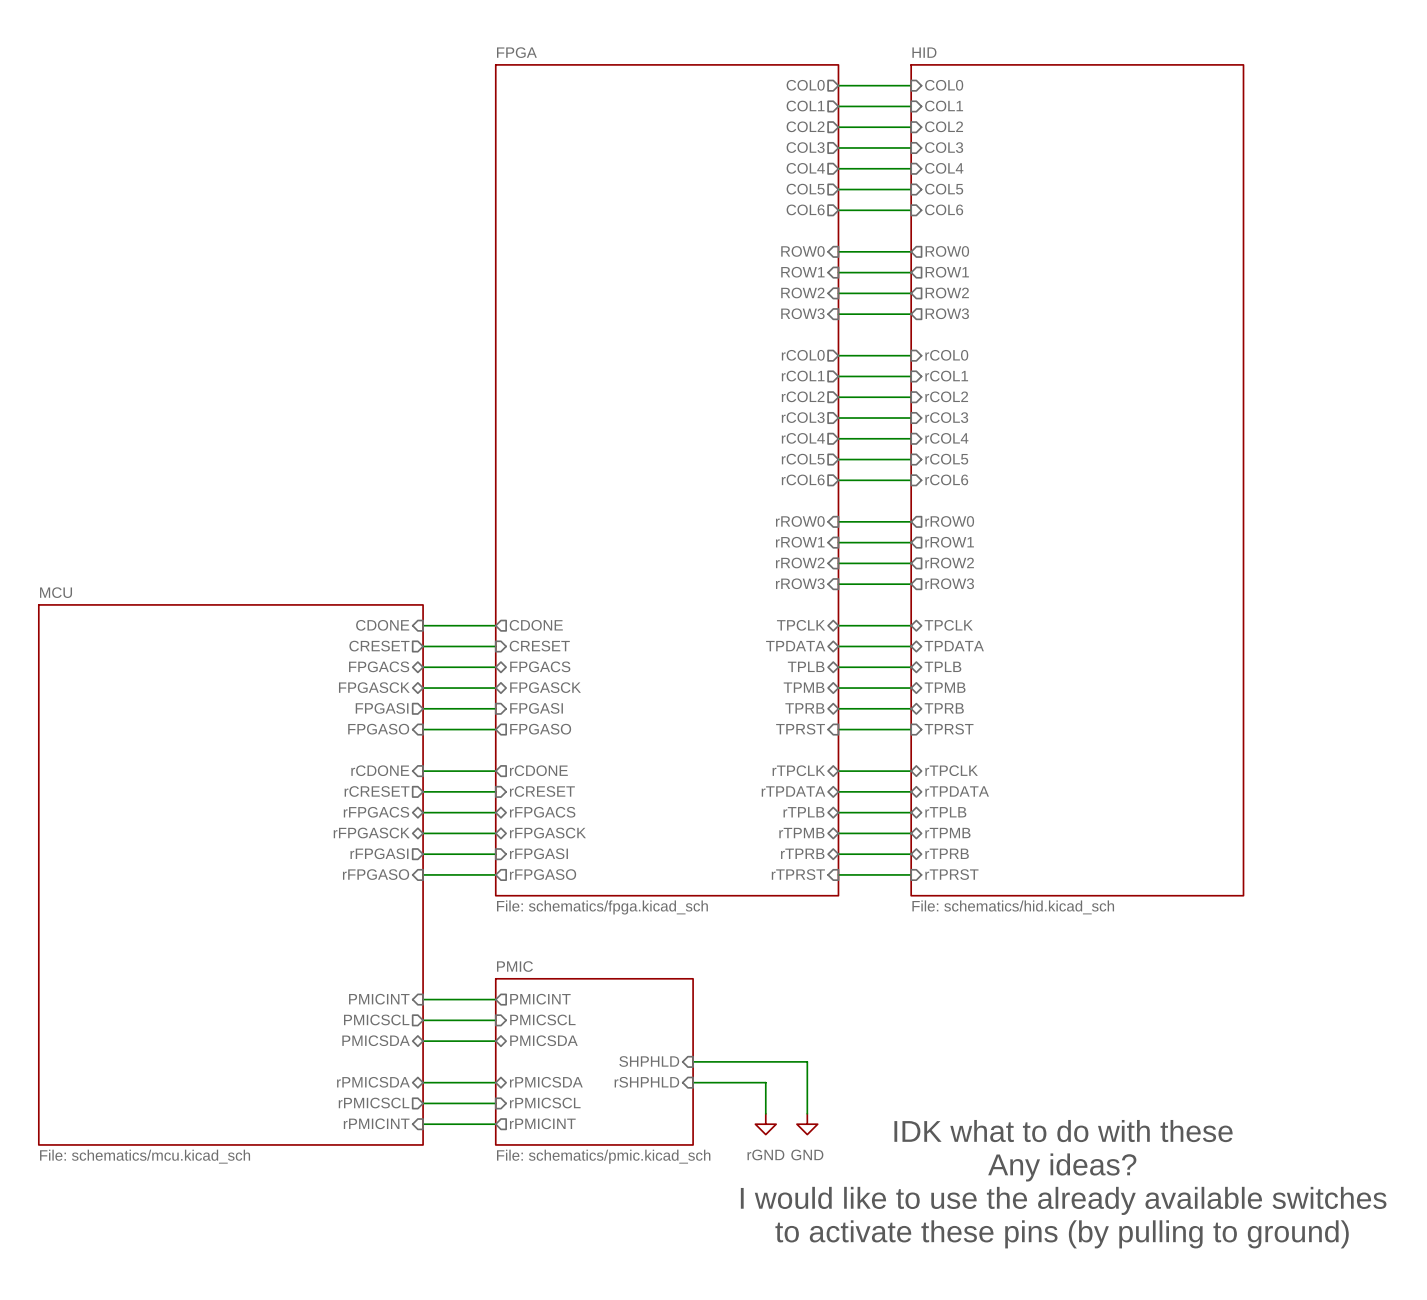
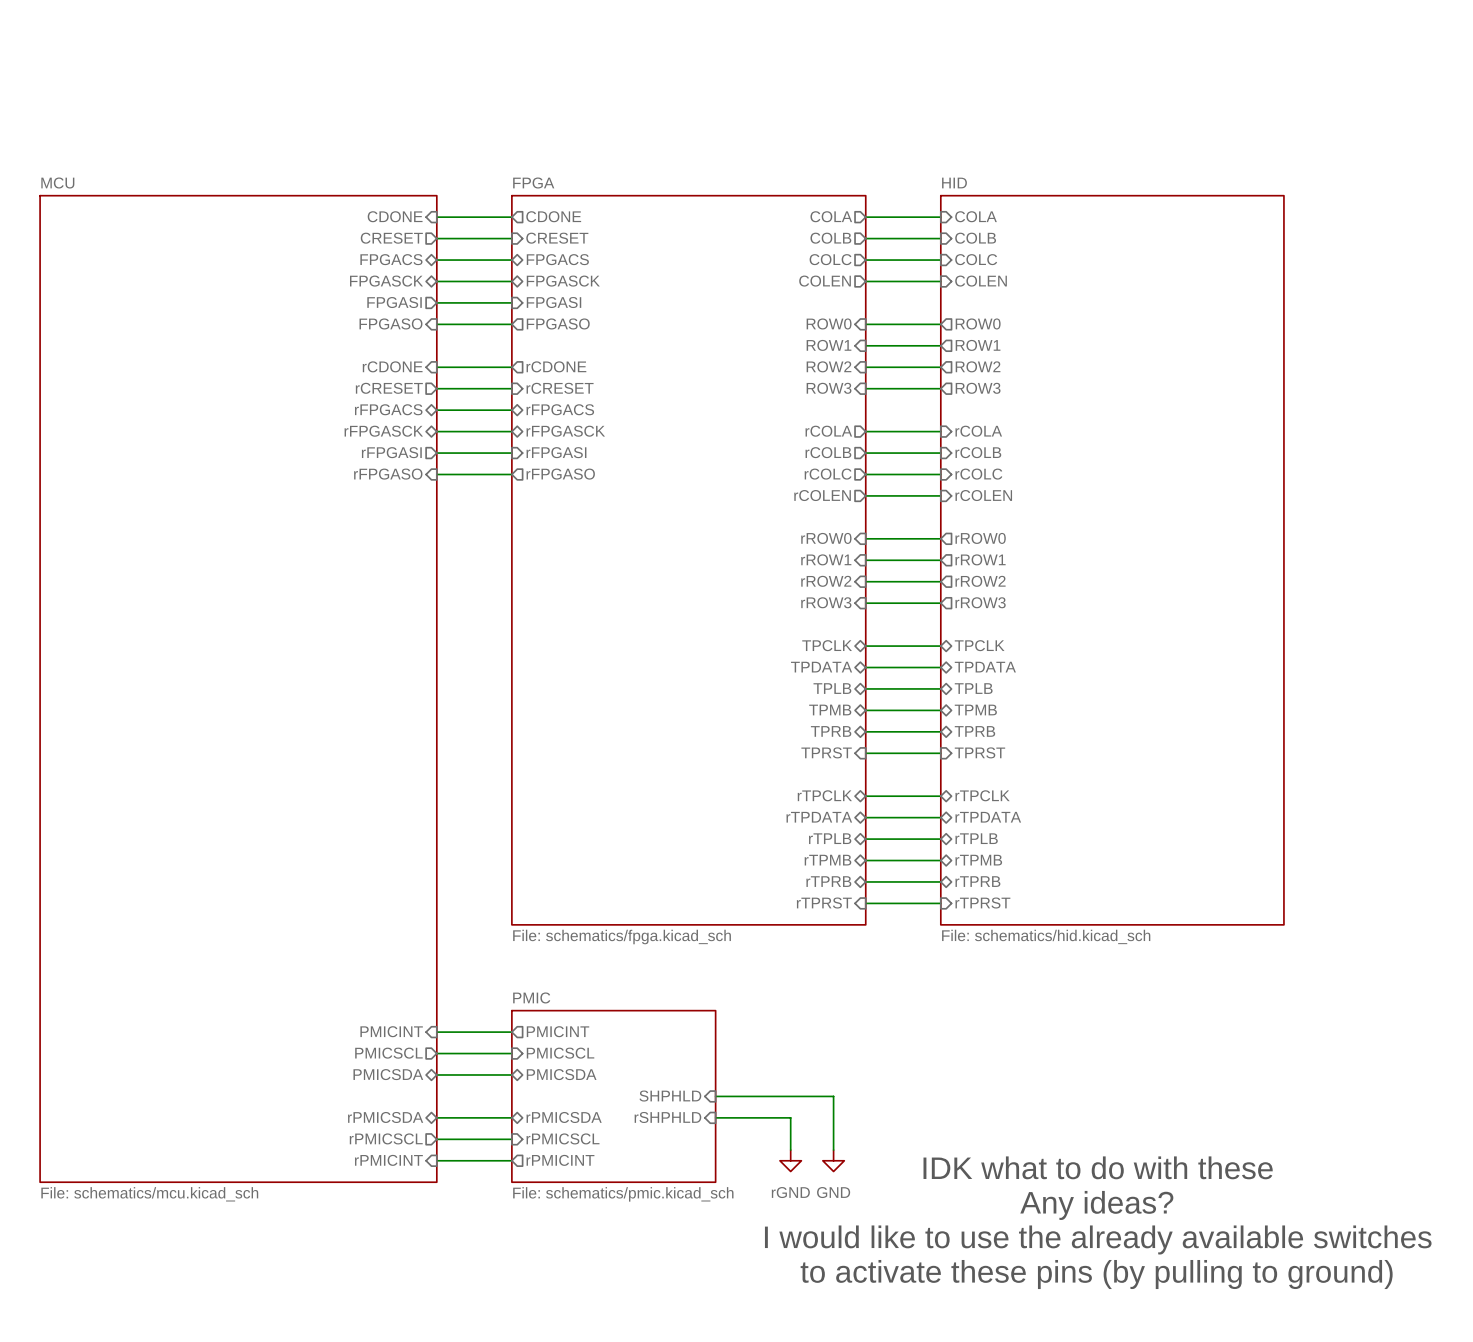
sheet pin: COL0 (805, 85) -> none
wire: (838, 85) (911, 85) -> none
sheet pin: COL0 (944, 85) -> none
sheet pin: COL1 (805, 106) -> none
wire: (838, 106) (911, 106) -> none
sheet pin: COL1 (944, 106) -> none
sheet pin: COL2 (805, 126) -> none
sheet pin: COL2 (944, 126) -> none
wire: (838, 127) (911, 127) -> none
sheet pin: COL3 (805, 147) -> none
wire: (838, 147) (911, 147) -> none
sheet pin: COL3 (944, 147) -> none
sheet pin: COL4 (805, 168) -> none
wire: (838, 168) (911, 168) -> none
sheet pin: COL4 (944, 168) -> none
sheet pin: COL5 (805, 189) -> none
wire: (838, 189) (911, 189) -> (865, 238) (940, 238)
sheet pin: COL5 (944, 189) -> none
sheet pin: none -> CDONE (395, 216)
sheet pin: none -> CDONE (553, 216)
sheet pin: COL6 (805, 209) -> COLA (831, 216)
sheet pin: COL6 (944, 209) -> COLA (976, 216)
wire: none -> (436, 217) (511, 217)
sheet pin: none -> CRESET (391, 238)
sheet pin: none -> CRESET (557, 238)
sheet pin: none -> COLB (830, 238)
sheet pin: none -> COLB (975, 238)
wire: none -> (436, 238) (511, 238)
sheet pin: none -> FPGACS (391, 259)
wire: none -> (436, 260) (511, 260)
sheet pin: none -> FPGACS (557, 259)
sheet pin shape: input (802, 251) -> output (830, 259)
sheet pin: ROW0 (802, 251) -> COLC (830, 259)
sheet pin shape: output (947, 251) -> input (976, 259)
sheet pin: ROW0 (947, 251) -> COLC (976, 259)
sheet pin: none -> FPGASCK (386, 281)
wire: none -> (436, 281) (511, 281)
sheet pin: none -> FPGASCK (563, 281)
sheet pin shape: input (802, 272) -> output (825, 281)
sheet pin: ROW1 (802, 272) -> COLEN (825, 281)
sheet pin shape: output (947, 272) -> input (981, 281)
sheet pin: ROW1 (947, 272) -> COLEN (981, 281)
sheet pin: none -> FPGASI (394, 302)
sheet pin: none -> FPGASI (554, 302)
sheet pin: ROW2 (802, 292) -> none
sheet pin: ROW2 (947, 292) -> none
wire: none -> (436, 302) (511, 302)
wire: (838, 293) (911, 293) -> (865, 345) (940, 345)
sheet pin: none -> FPGASO (390, 323)
sheet pin: none -> FPGASO (558, 323)
sheet pin: ROW3 (802, 313) -> ROW0 (829, 323)
sheet pin: ROW3 (947, 313) -> ROW0 (978, 323)
wire: none -> (436, 324) (511, 324)
sheet pin: none -> ROW1 (829, 345)
sheet pin: none -> ROW1 (978, 345)
sheet pin: none -> rCDONE (392, 366)
wire: none -> (436, 367) (511, 367)
sheet pin: none -> rCDONE (556, 366)
sheet pin shape: output (803, 355) -> input (829, 366)
sheet pin: rCOL0 (803, 355) -> ROW2 (829, 366)
sheet pin shape: input (946, 355) -> output (978, 366)
sheet pin: rCOL0 (946, 355) -> ROW2 (978, 366)
sheet pin: none -> rCRESET (389, 388)
wire: none -> (436, 388) (511, 388)
sheet pin: none -> rCRESET (560, 388)
sheet pin shape: output (803, 376) -> input (829, 388)
sheet pin: rCOL1 (803, 376) -> ROW3 (829, 388)
sheet pin shape: input (946, 376) -> output (978, 388)
sheet pin: rCOL1 (946, 376) -> ROW3 (978, 388)
sheet pin: none -> rFPGACS (388, 409)
sheet pin: none -> rFPGACS (560, 409)
sheet pin: rCOL2 (803, 396) -> none
sheet pin: rCOL2 (946, 396) -> none
wire: none -> (436, 410) (511, 410)
wire: (838, 397) (911, 397) -> none
sheet pin: none -> rFPGASCK (383, 431)
sheet pin: none -> rFPGASCK (565, 431)
sheet pin: rCOL3 (803, 417) -> rCOLA (828, 431)
sheet pin: rCOL3 (946, 417) -> rCOLA (978, 431)
wire: none -> (436, 431) (511, 431)
sheet pin: none -> rFPGASI (391, 452)
wire: none -> (436, 453) (511, 453)
sheet pin: none -> rFPGASI (556, 452)
sheet pin: rCOL4 (803, 438) -> rCOLB (828, 452)
sheet pin: rCOL4 (946, 438) -> rCOLB (978, 452)
sheet pin: none -> rFPGASO (388, 474)
sheet pin: none -> rFPGASO (560, 474)
sheet pin: rCOL5 (803, 459) -> rCOLC (828, 474)
sheet pin: rCOL5 (946, 459) -> rCOLC (978, 474)
sheet pin: rCOL6 (803, 479) -> rCOLEN (822, 495)
sheet pin: rCOL6 (946, 479) -> rCOLEN (983, 495)
sheet FPGA: File: schematics/fpga.kicad_sch (667, 480) -> none
sheet HID: File: schematics/hid.kicad_sch (1077, 480) -> none
sheet FPGA: none -> File: schematics/fpga.kicad_sch (688, 560)
sheet HID: none -> File: schematics/hid.kicad_sch (1112, 560)
sheet pin: CDONE (382, 625) -> none
wire: (423, 625) (495, 625) -> (436, 474) (511, 474)
sheet pin: CDONE (536, 625) -> none
sheet pin: CRESET (379, 646) -> none
wire: (423, 646) (495, 646) -> none
sheet pin: CRESET (539, 646) -> none
sheet pin: FPGACS (379, 666) -> none
sheet pin: FPGACS (540, 666) -> none
sheet MCU: none -> File: schematics/mcu.kicad_sch (238, 688)
wire: (423, 667) (495, 667) -> none
sheet pin: FPGASCK (374, 687) -> none
sheet pin: FPGASCK (545, 687) -> none
wire: (423, 688) (495, 688) -> none
sheet pin: FPGASI (382, 708) -> none
wire: (423, 708) (495, 708) -> none
sheet pin: FPGASI (536, 708) -> none
sheet pin: FPGASO (378, 729) -> none
wire: (423, 729) (495, 729) -> none
sheet pin: FPGASO (540, 729) -> none
sheet pin: rCDONE (380, 770) -> none
sheet pin: rCDONE (538, 770) -> none
wire: (423, 771) (495, 771) -> none
sheet pin: rCRESET (377, 791) -> none
wire: (423, 791) (495, 791) -> none
sheet pin: rCRESET (542, 791) -> none
sheet pin: rFPGACS (376, 812) -> none
wire: (423, 812) (495, 812) -> none
sheet pin: rFPGACS (542, 812) -> none
sheet pin: rFPGASCK (371, 833) -> none
wire: (423, 833) (495, 833) -> none
sheet pin: rFPGASCK (547, 833) -> none
sheet pin: rFPGASI (379, 853) -> none
sheet pin: rFPGASI (538, 853) -> none
wire: (423, 854) (495, 854) -> none
sheet MCU: File: schematics/mcu.kicad_sch (230, 874) -> none
sheet pin: rFPGASO (376, 874) -> none
wire: (423, 874) (495, 874) -> none
sheet pin: rFPGASO (543, 874) -> none

